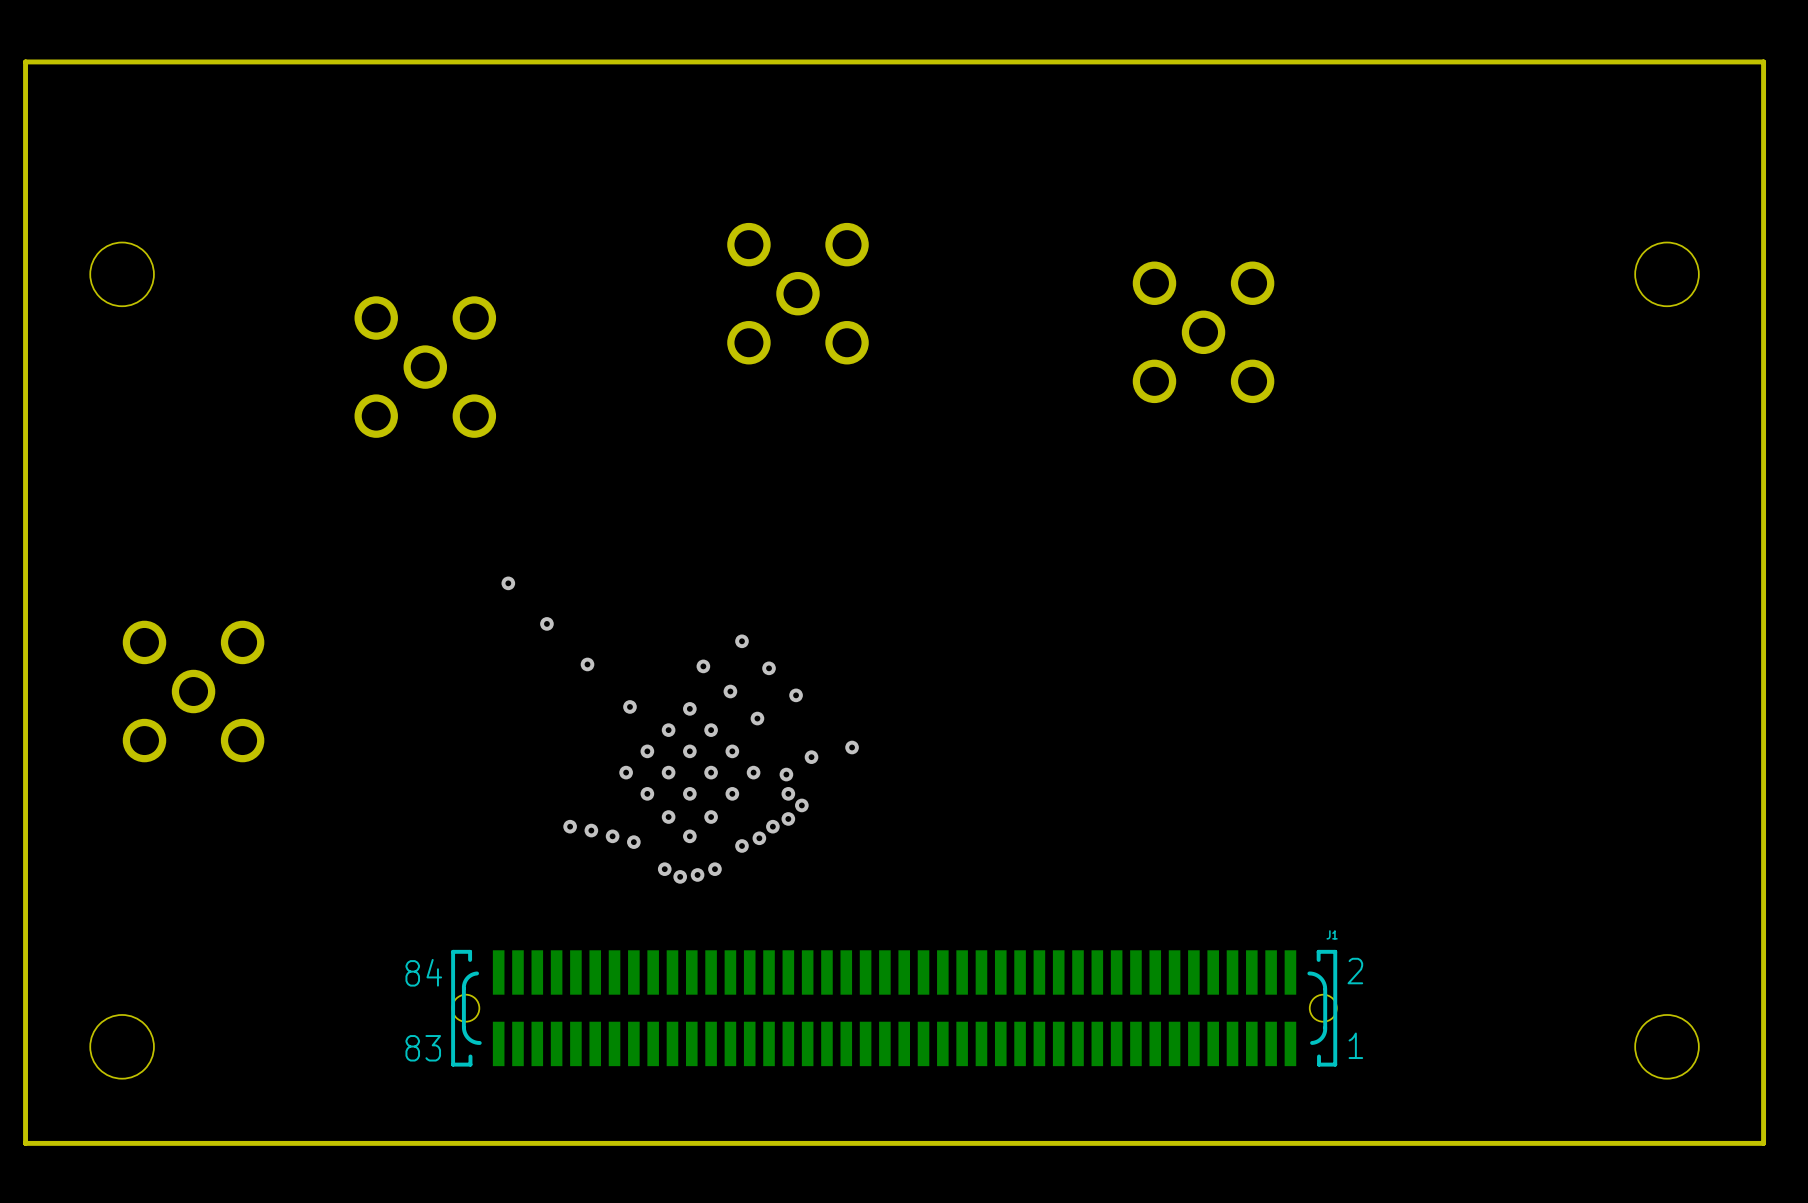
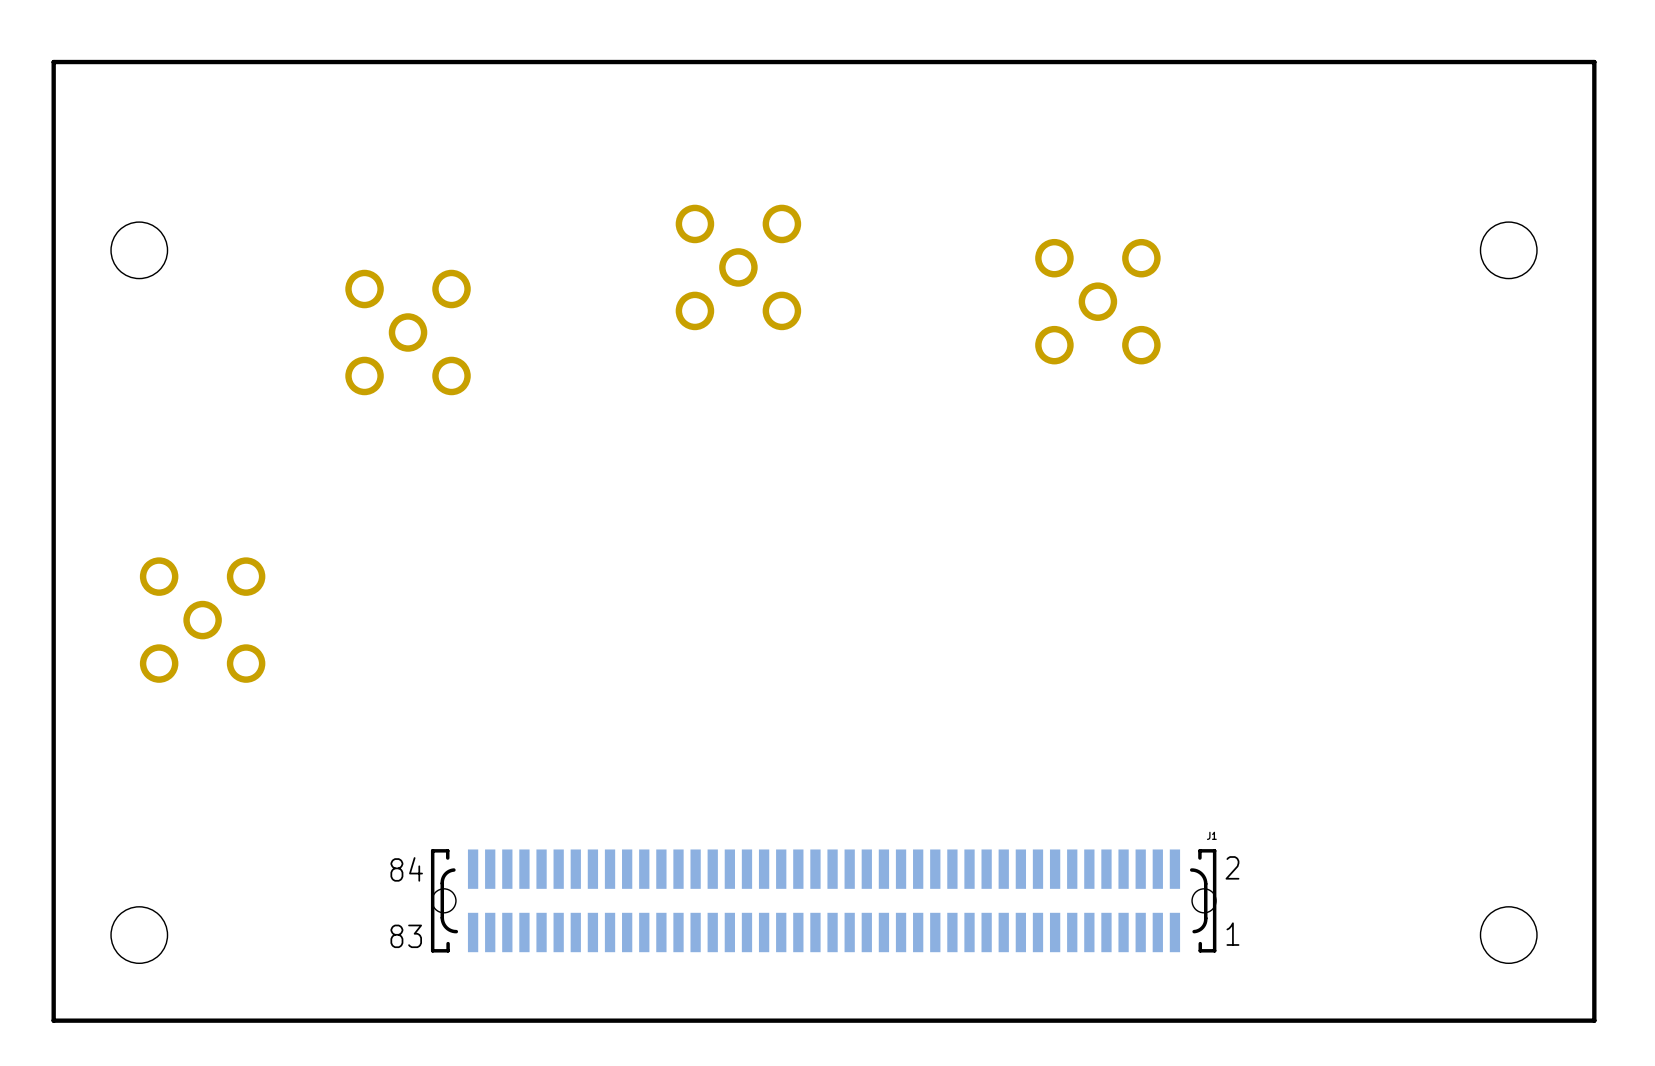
via: (508, 583) -> none
via: (546, 623) -> none
via: (741, 641) -> none
via: (587, 664) -> none
via: (703, 666) -> none
via: (769, 668) -> none
via: (730, 691) -> none
via: (796, 695) -> none
via: (629, 706) -> none
via: (689, 708) -> none
via: (757, 718) -> none
via: (668, 730) -> none
via: (711, 730) -> none
via: (852, 747) -> none
via: (647, 751) -> none
via: (689, 751) -> none
via: (732, 751) -> none
via: (811, 757) -> none
via: (626, 772) -> none
via: (668, 772) -> none
via: (711, 772) -> none
via: (753, 772) -> none
via: (786, 774) -> none
via: (647, 793) -> none
via: (689, 793) -> none
via: (732, 793) -> none
via: (788, 793) -> none
via: (801, 805) -> none
via: (668, 817) -> none
via: (711, 817) -> none
via: (788, 818) -> none
via: (570, 826) -> none
via: (772, 826) -> none
via: (591, 830) -> none
via: (612, 836) -> none
via: (689, 836) -> none
via: (759, 838) -> none
via: (633, 842) -> none
via: (741, 845) -> none
via: (664, 869) -> none
via: (714, 869) -> none
via: (697, 874) -> none
via: (680, 876) -> none

